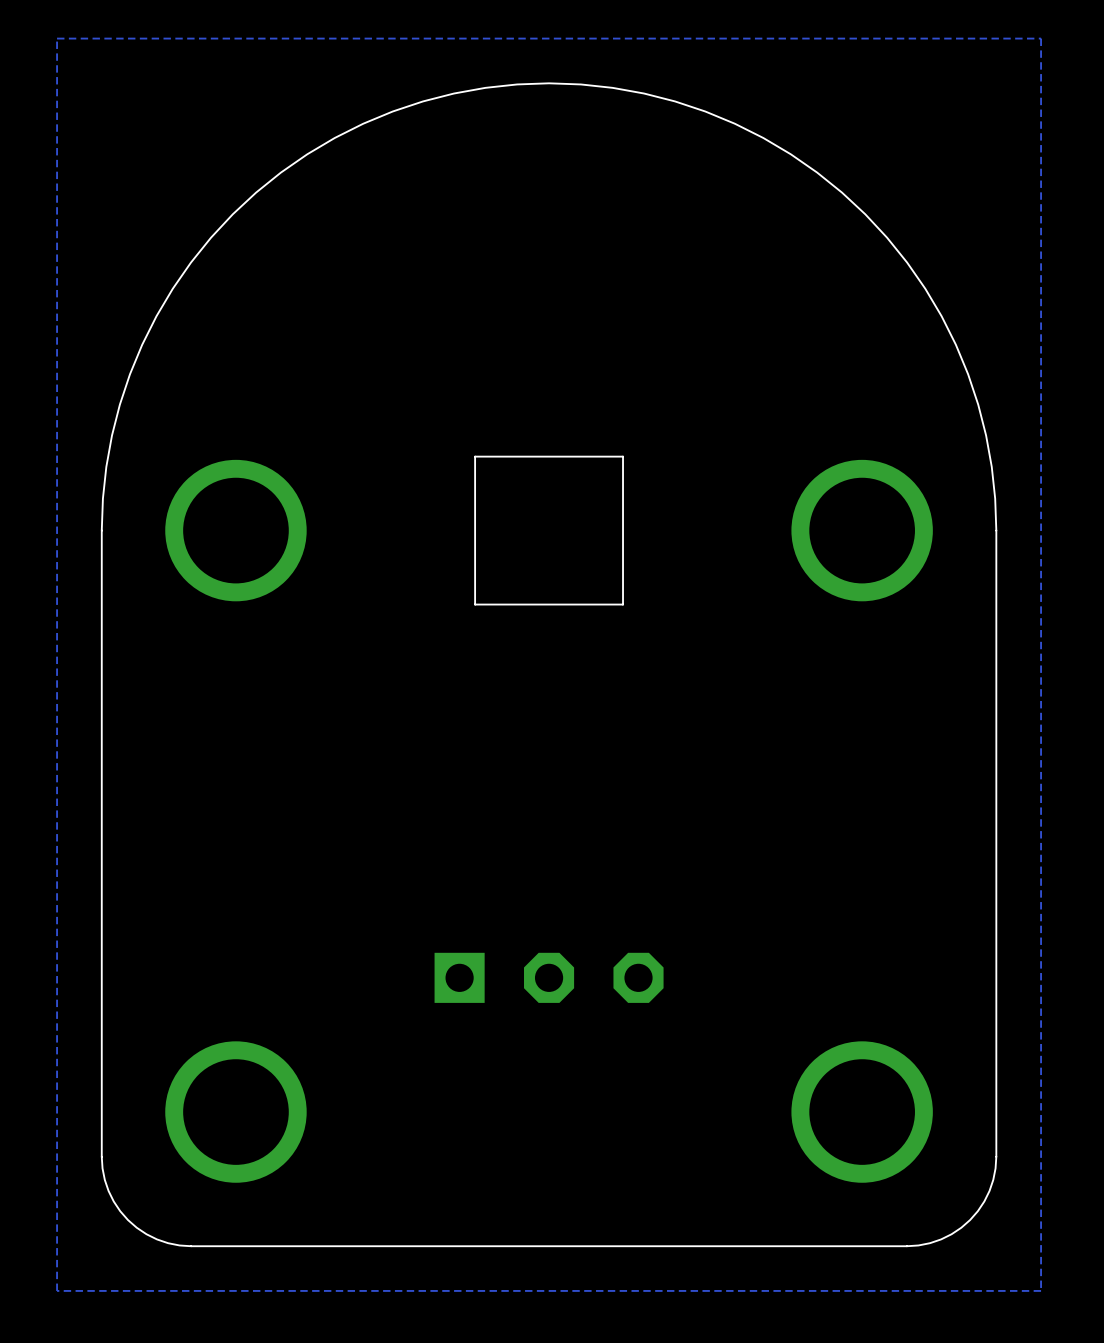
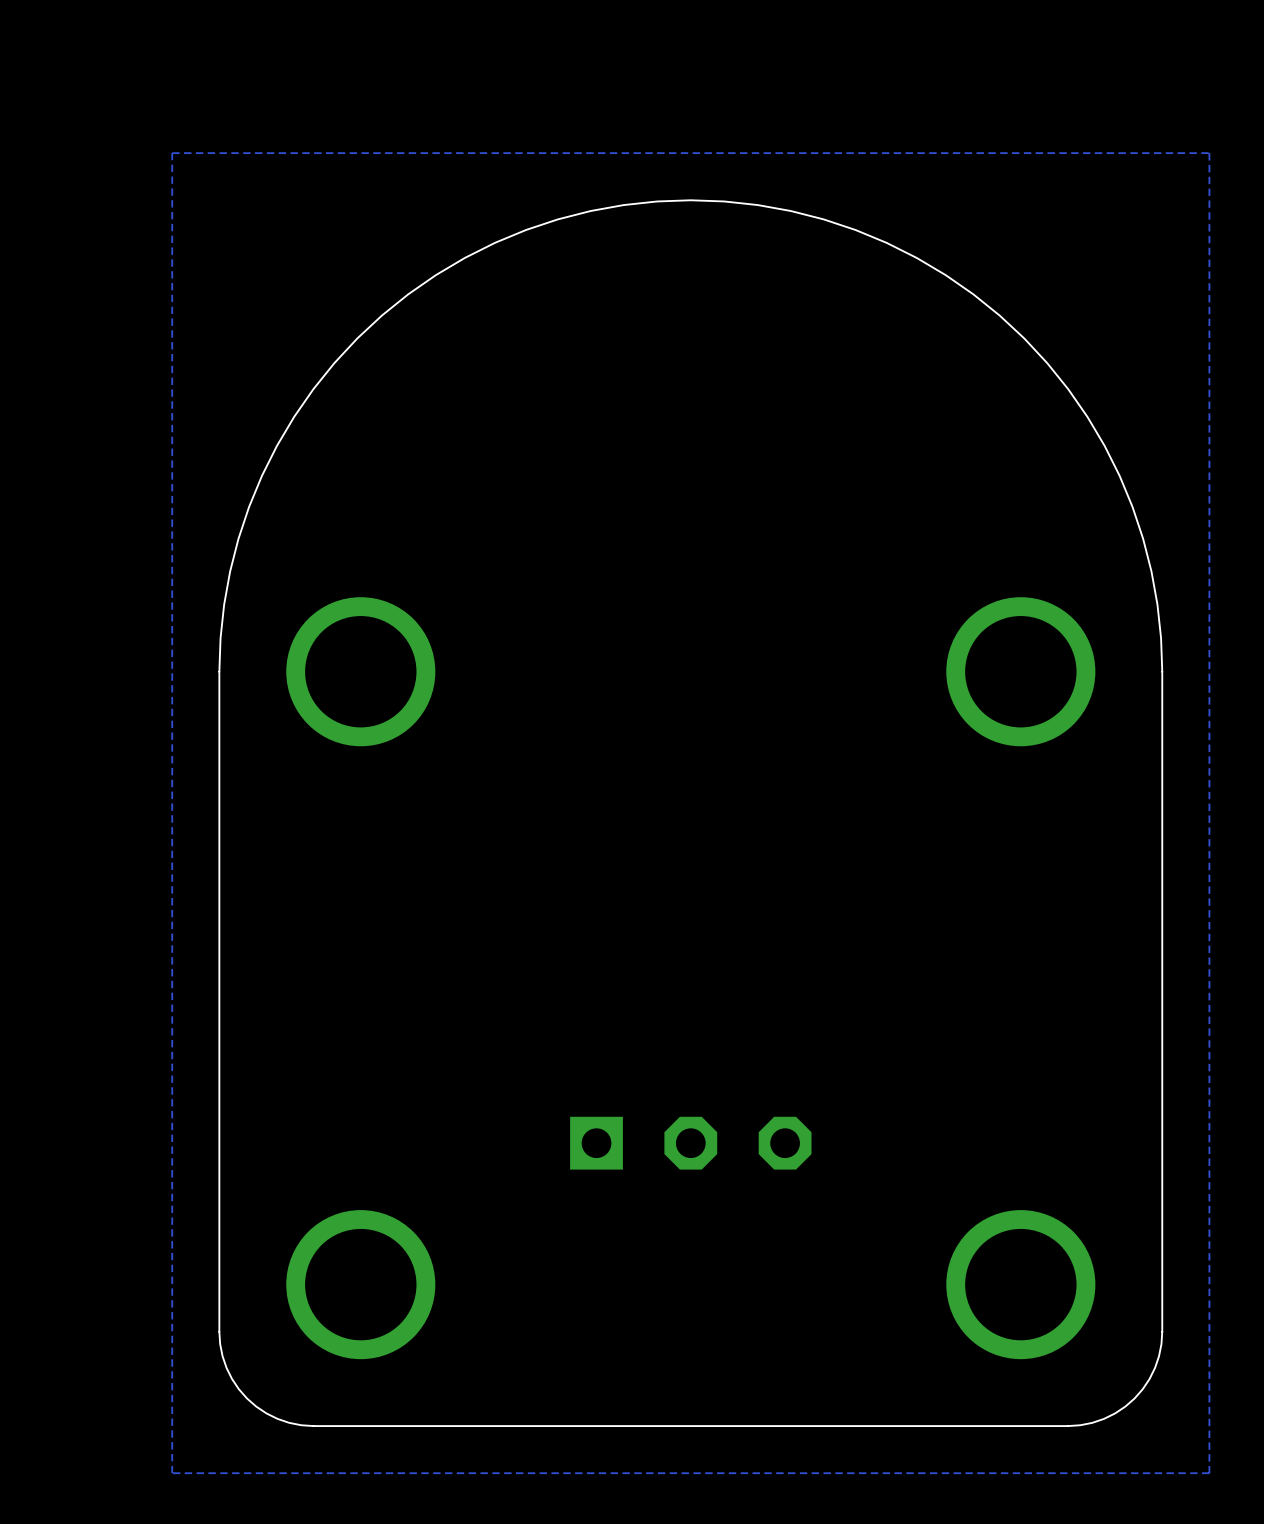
part: (549, 530) -> none

